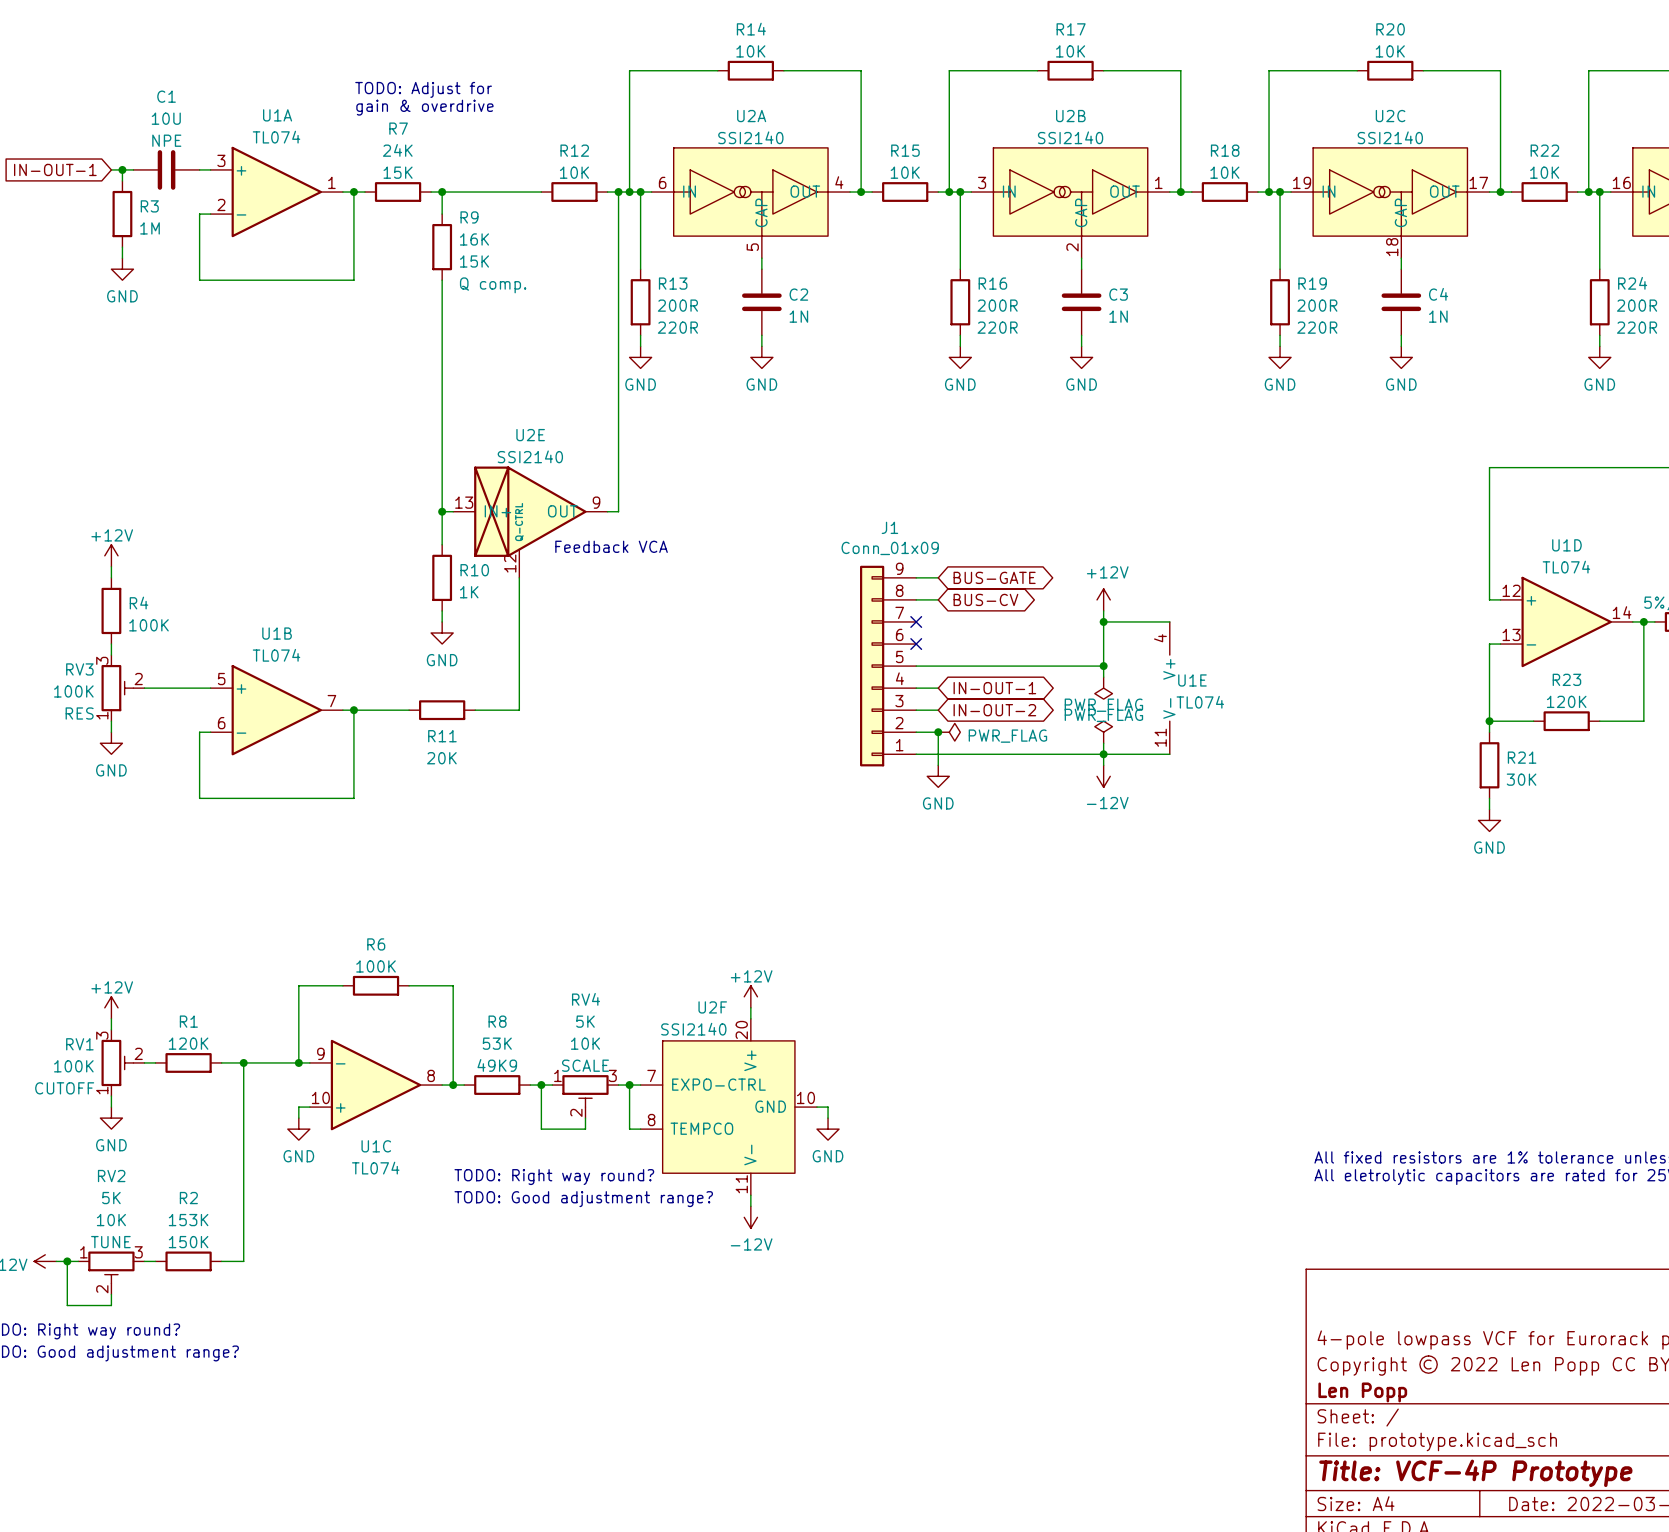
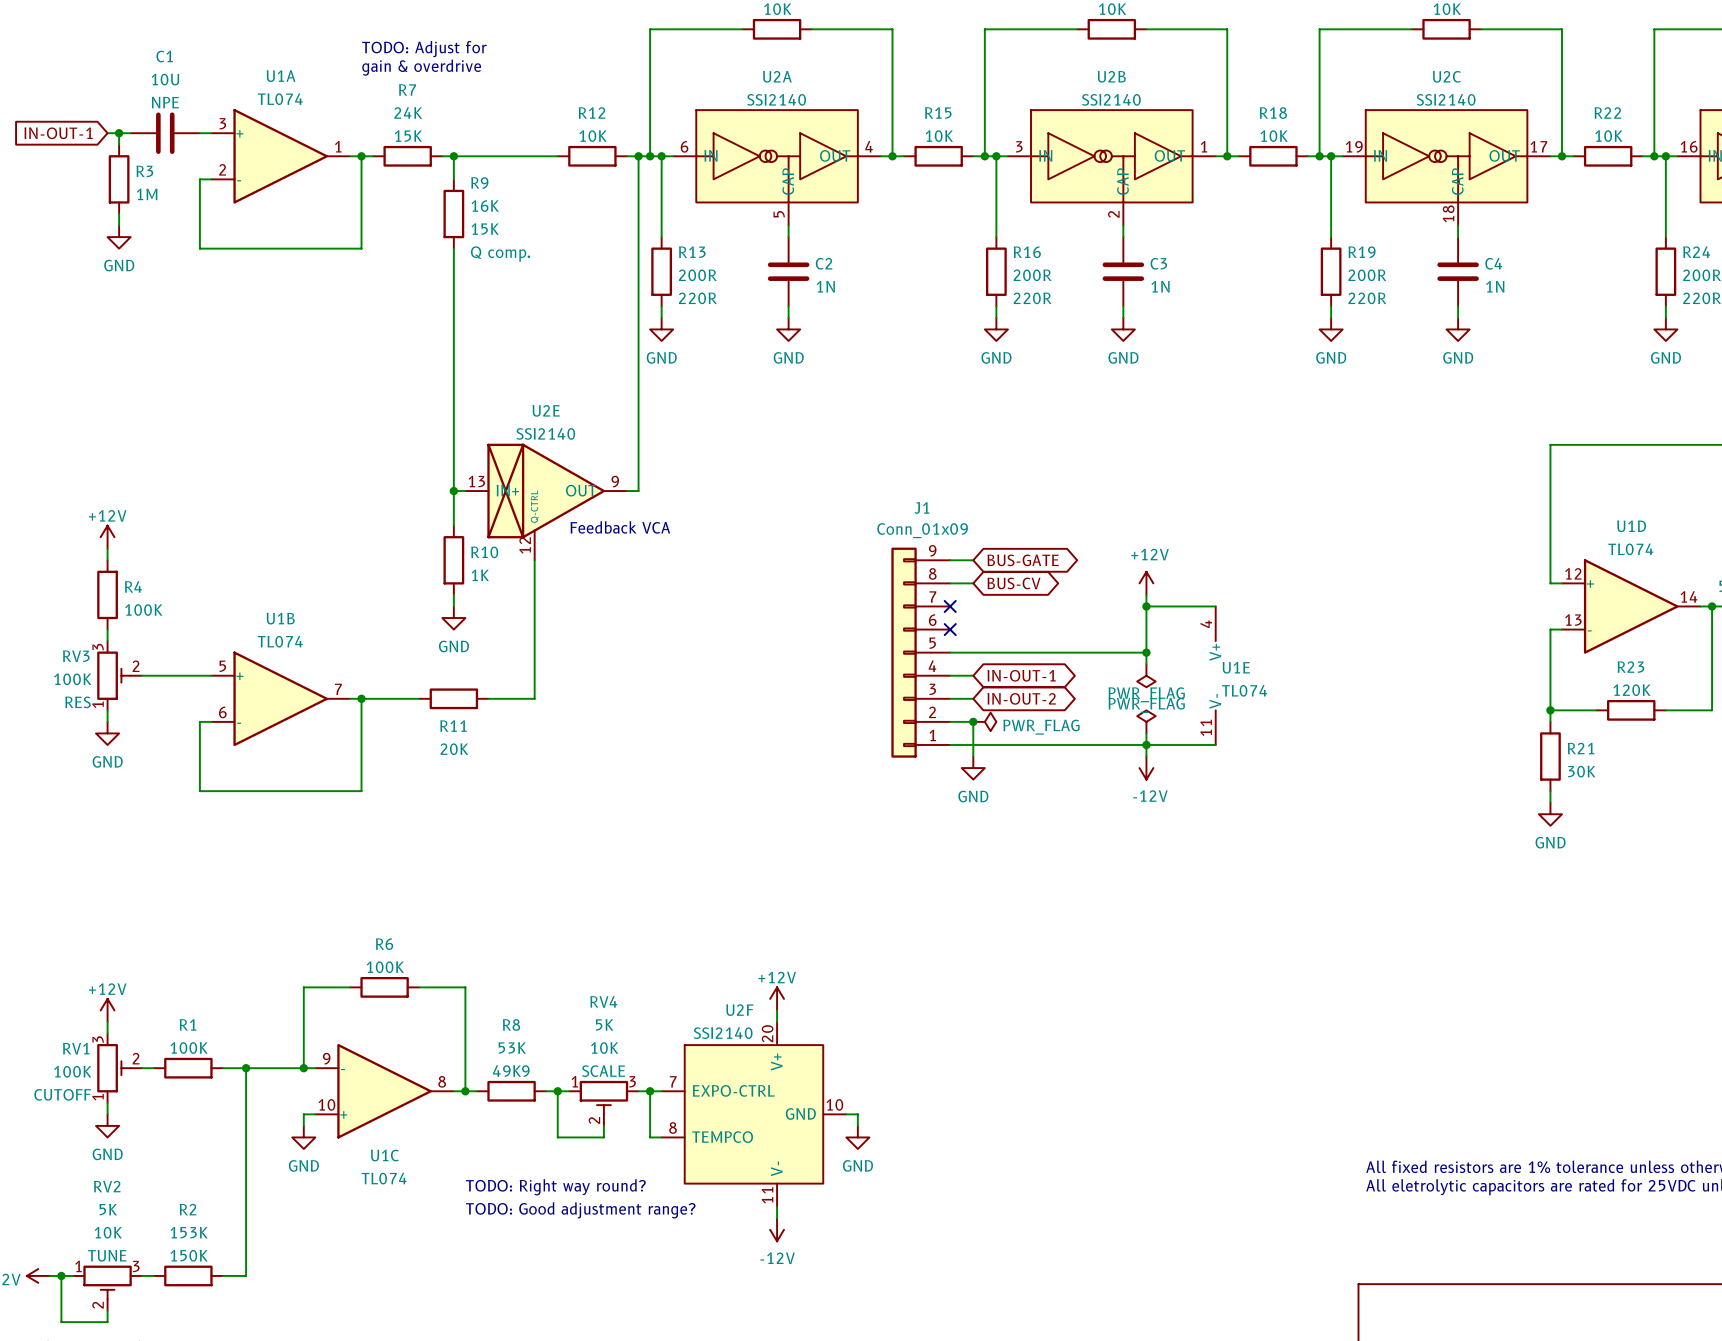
R1 value: 120K (188, 1043) -> 100K (189, 1048)

